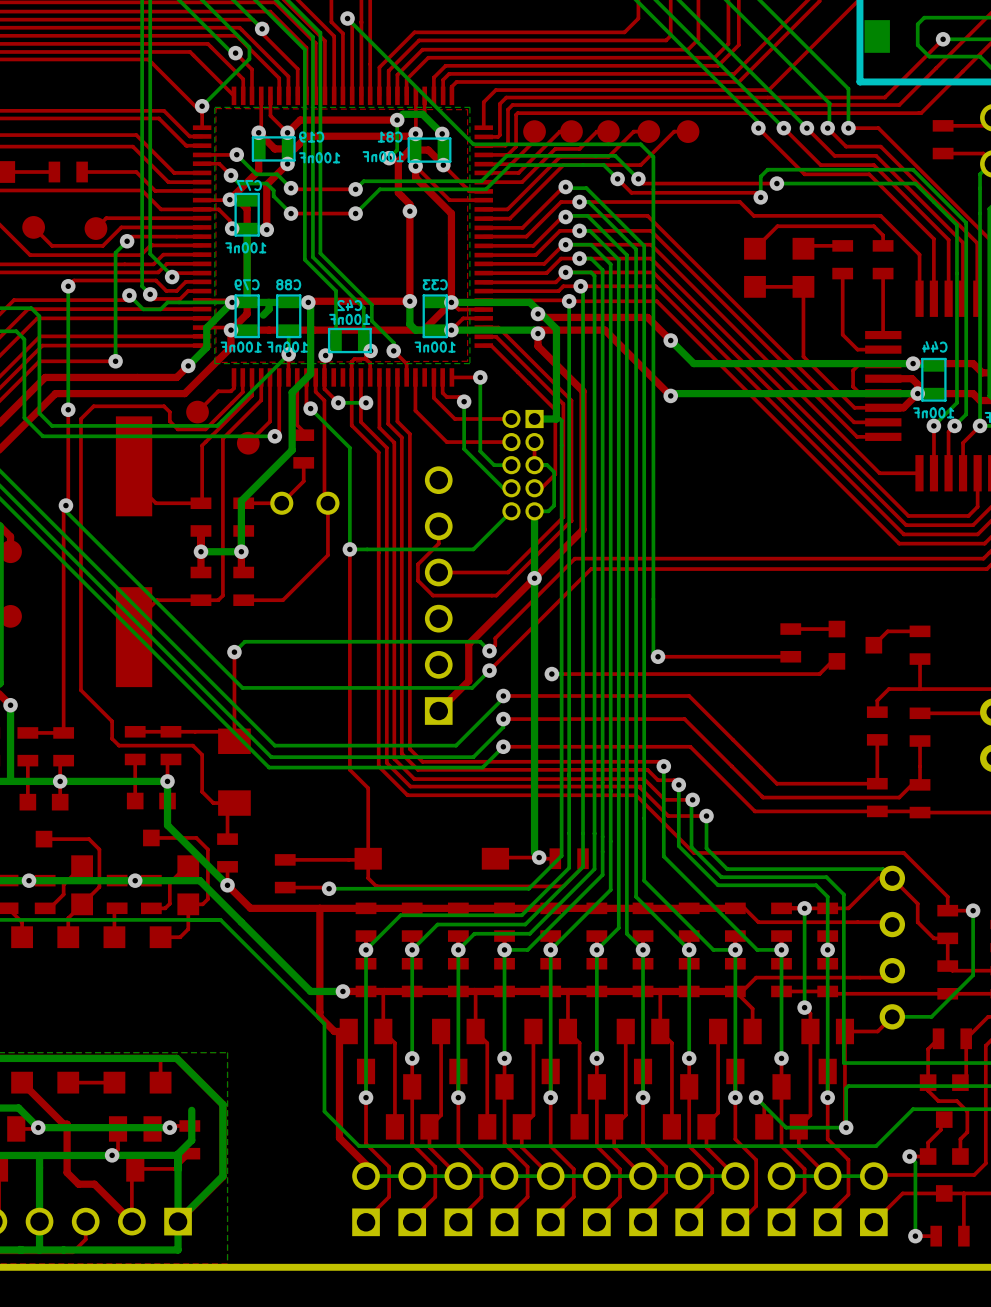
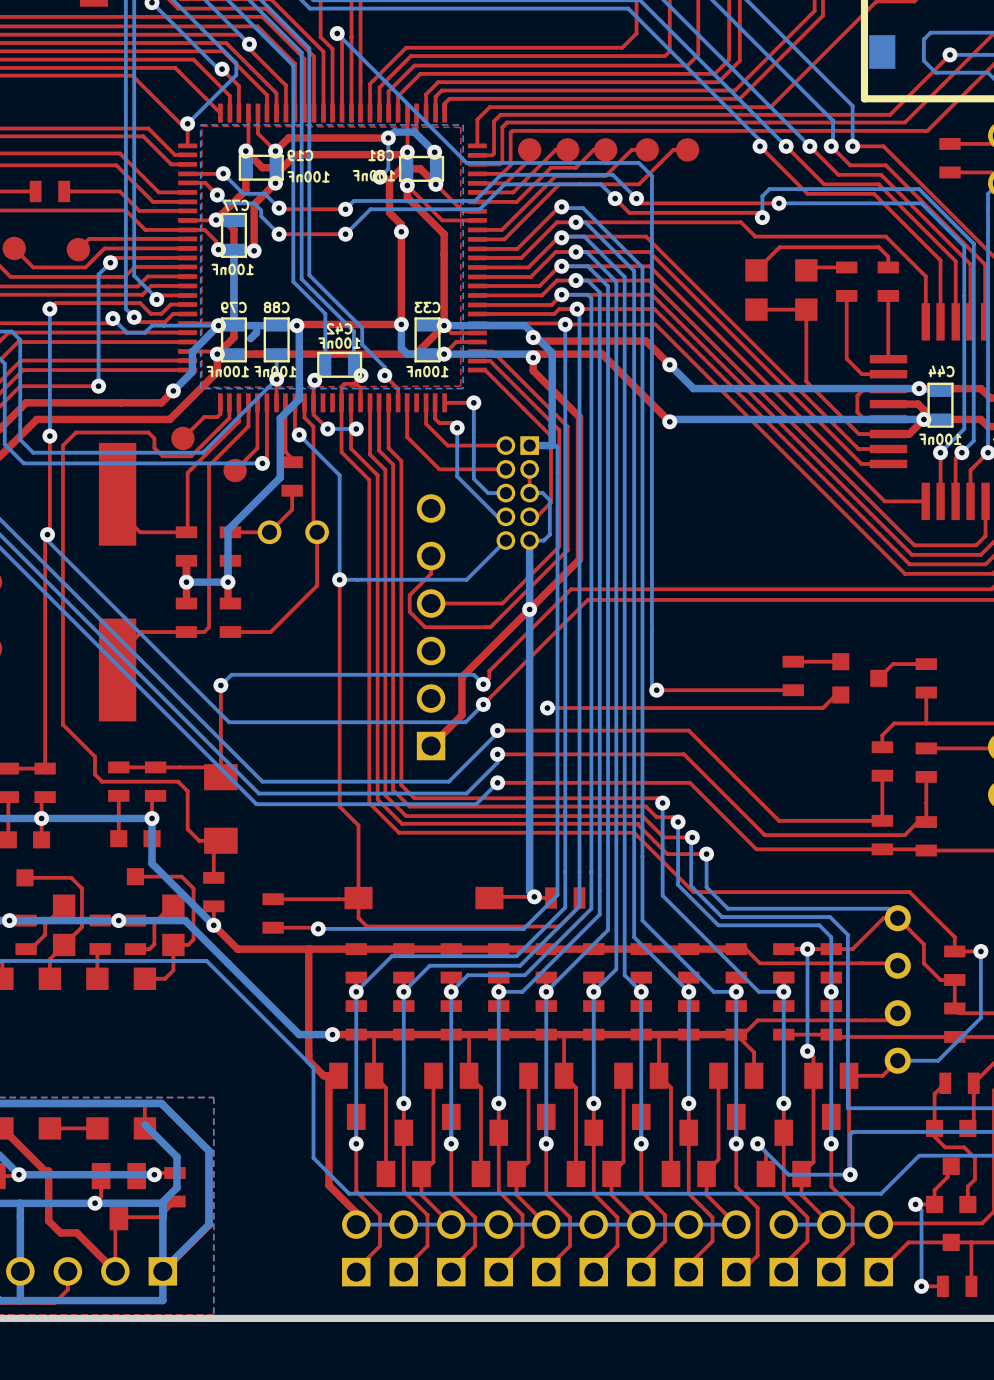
bottom track: none -> (144, 1124) (176, 1156)

